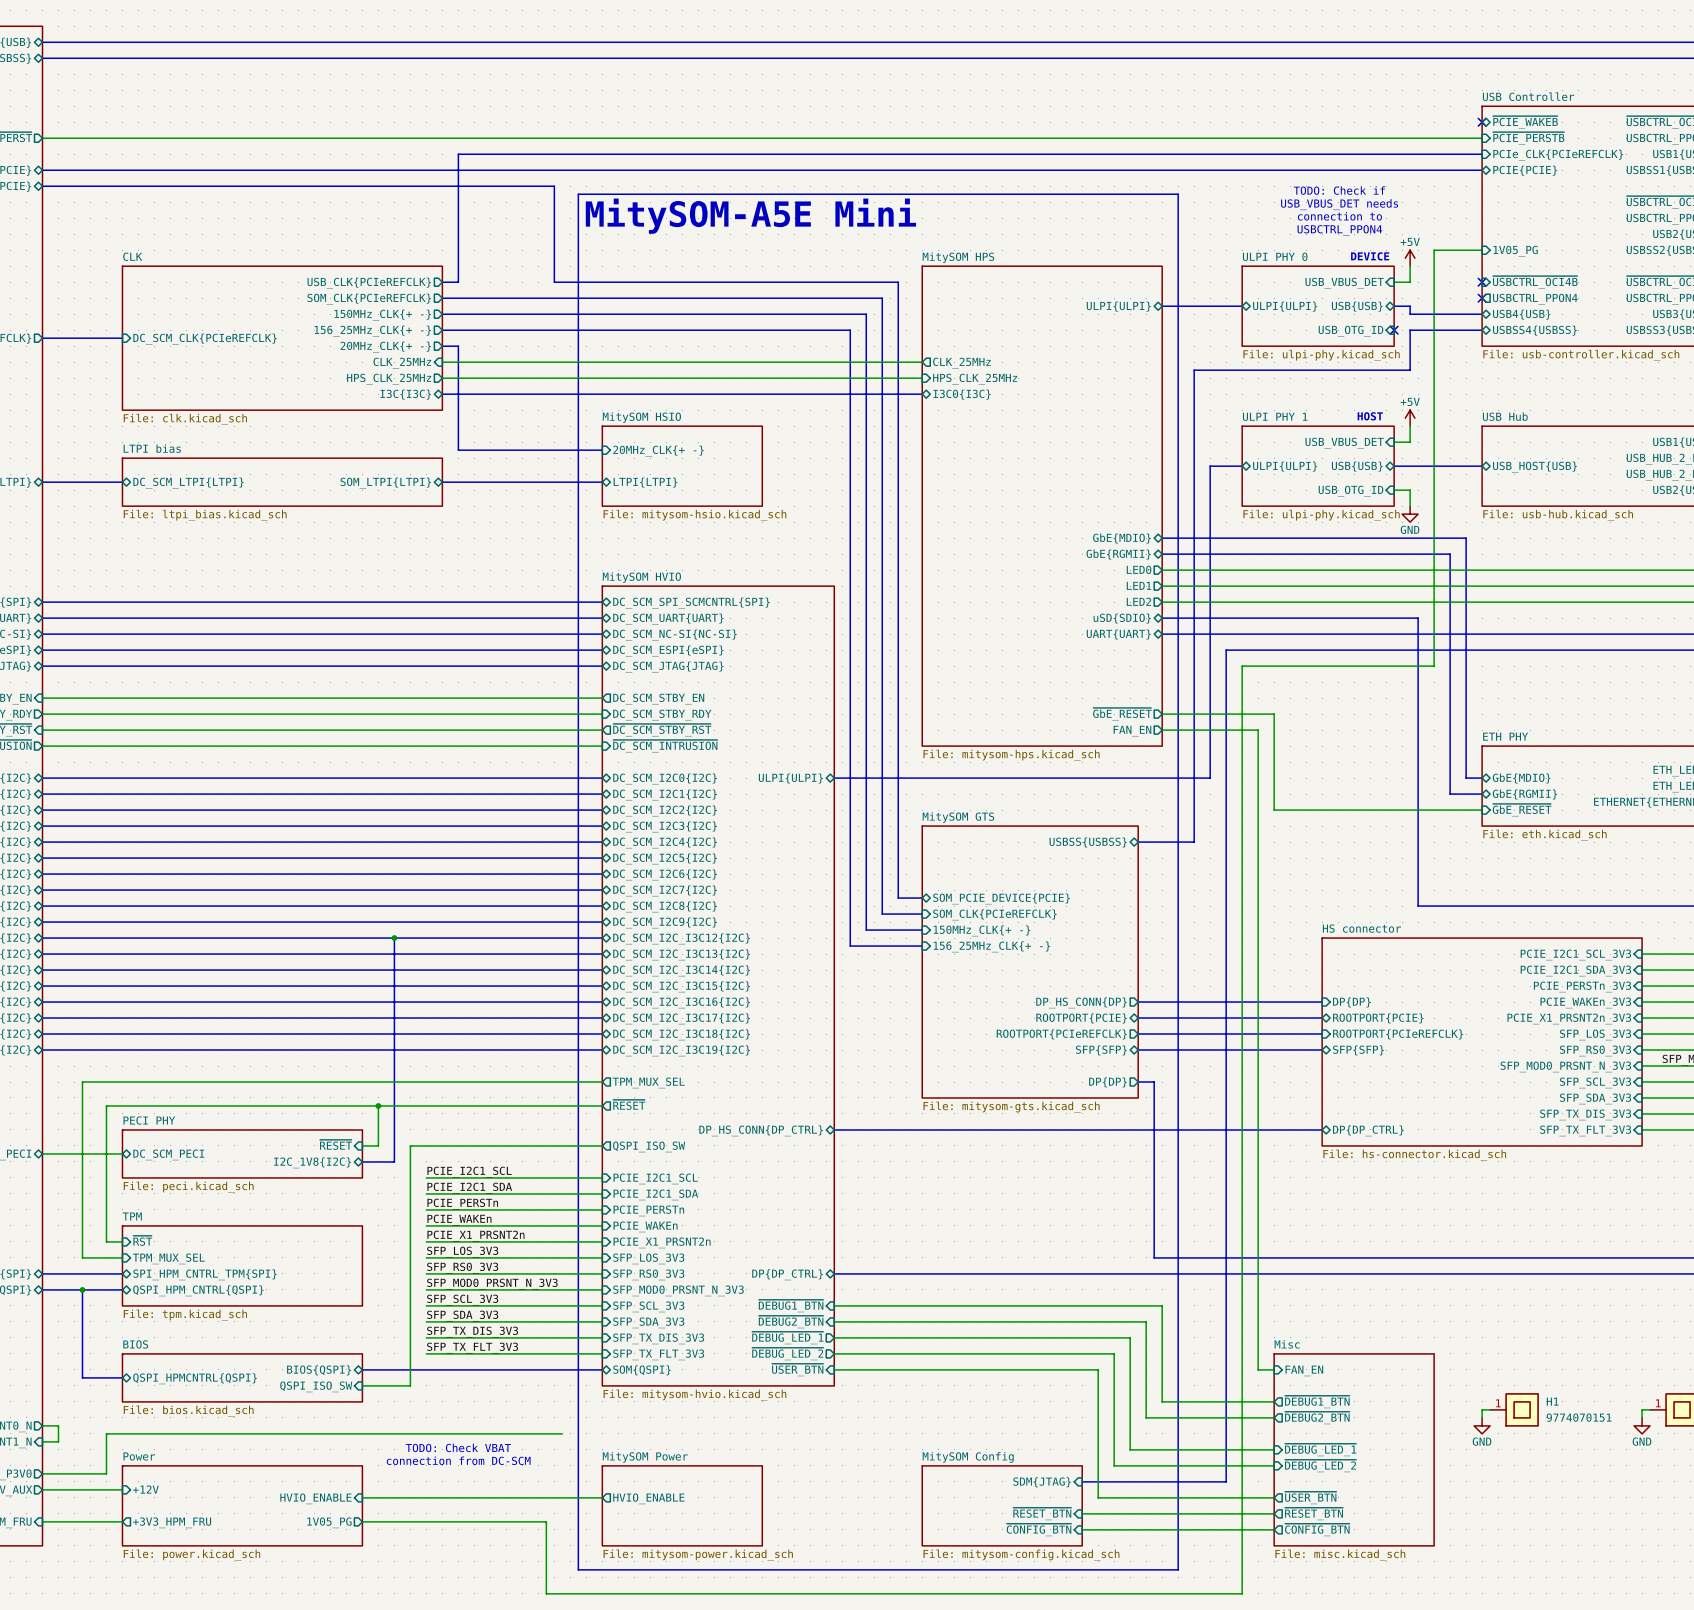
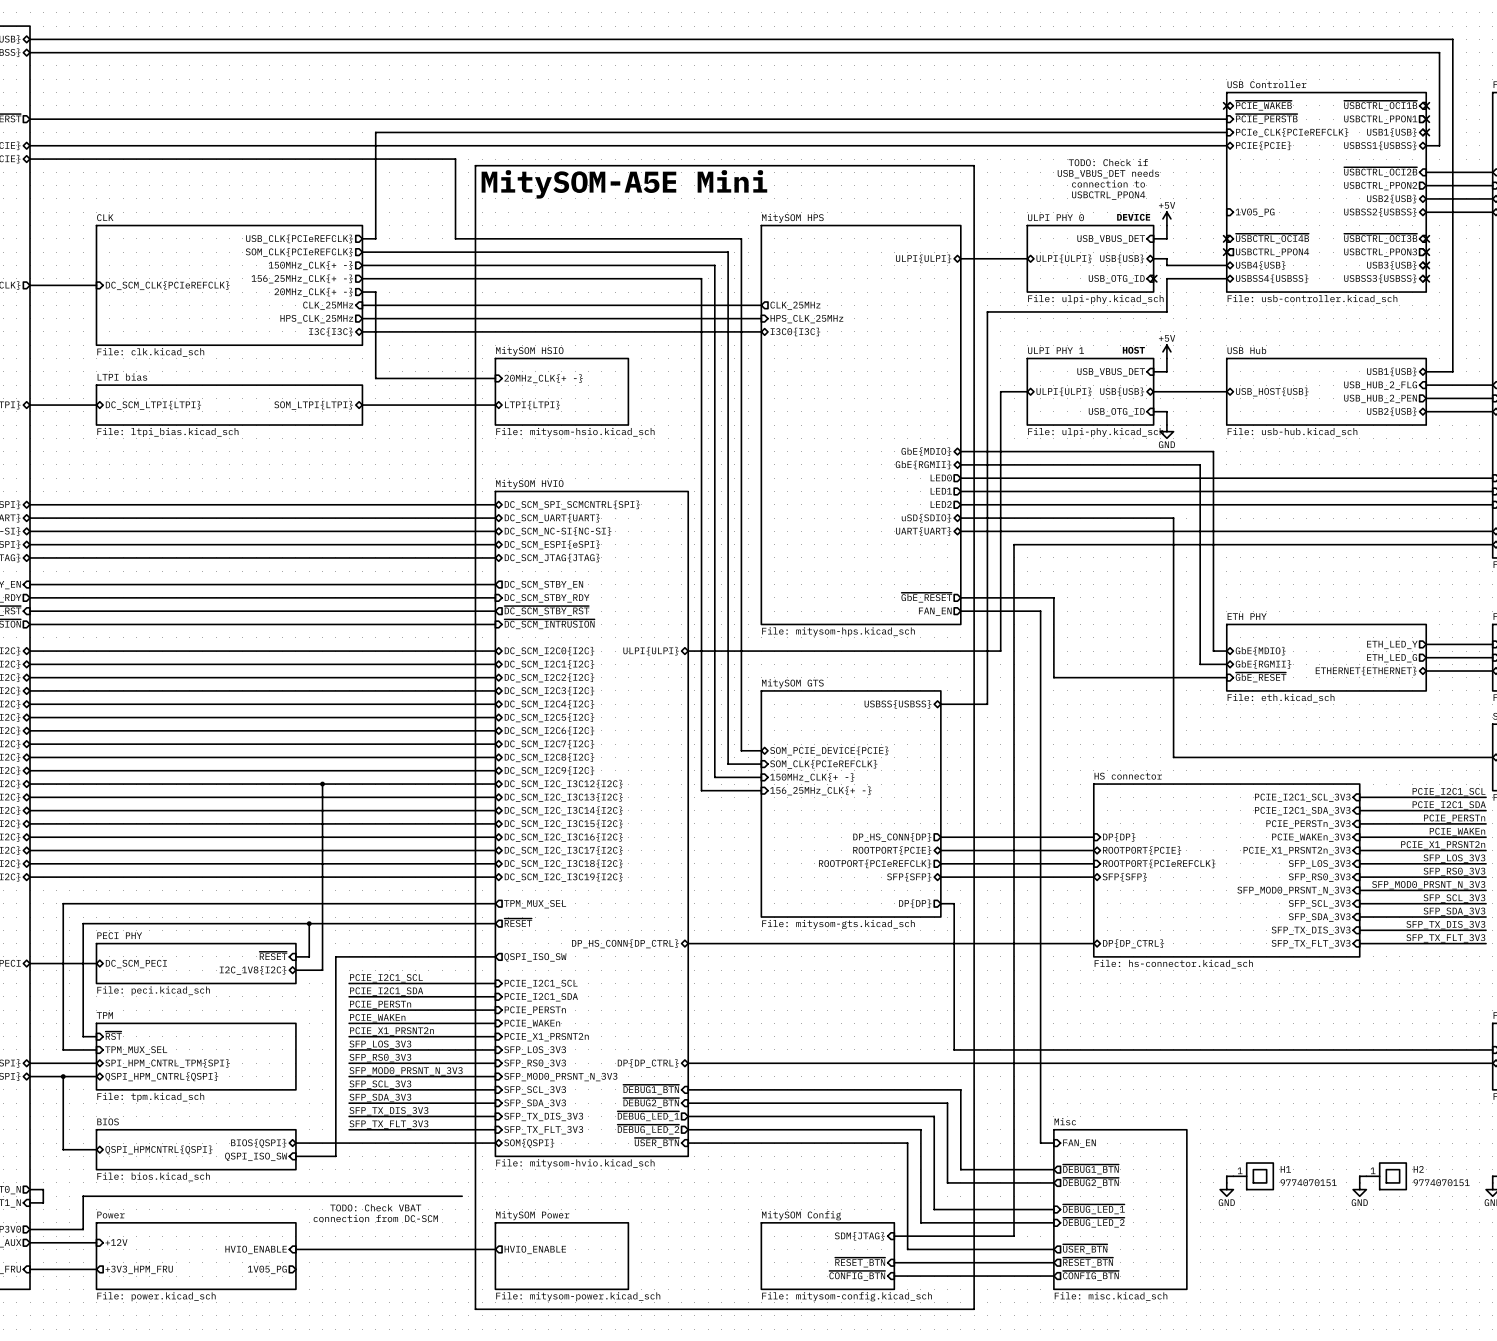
wire: (1482, 250) (1434, 250) (1434, 666) (1242, 666) (1242, 1593) (546, 1593) (546, 1521) (362, 1521) -> none

